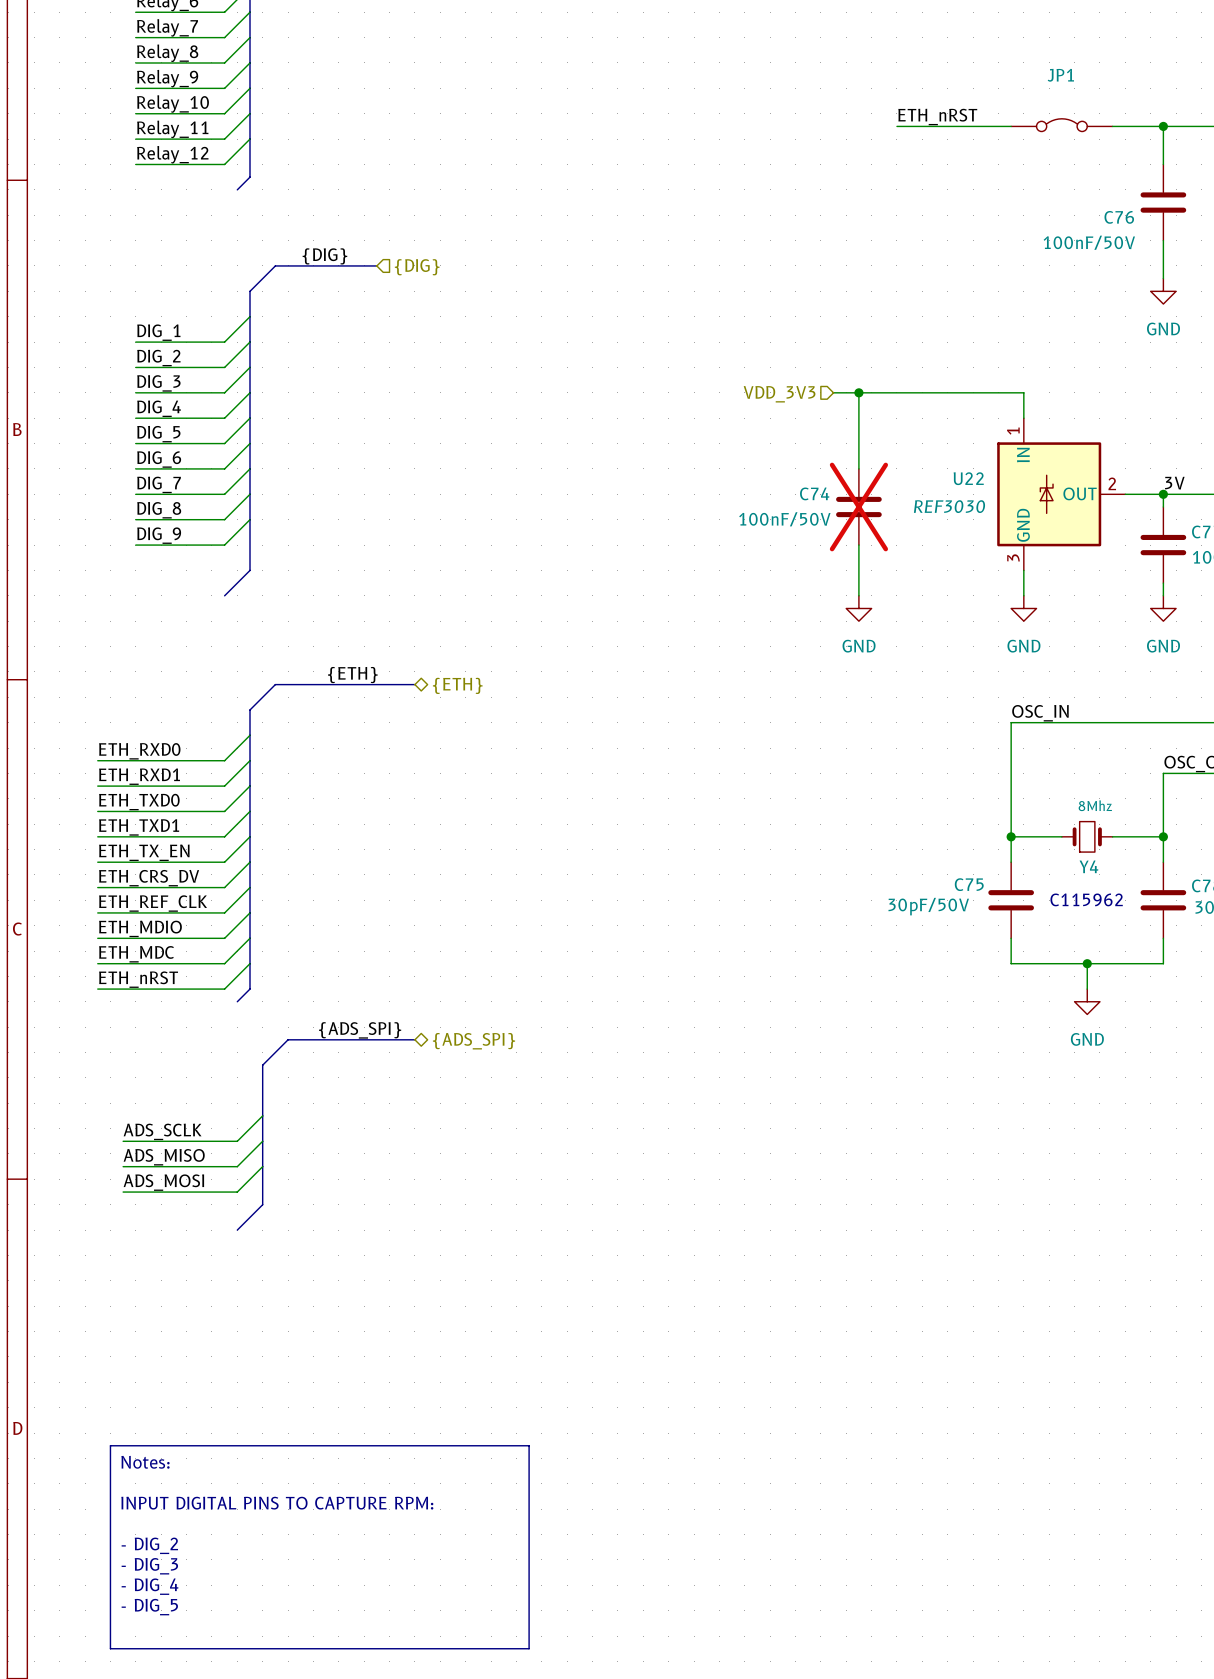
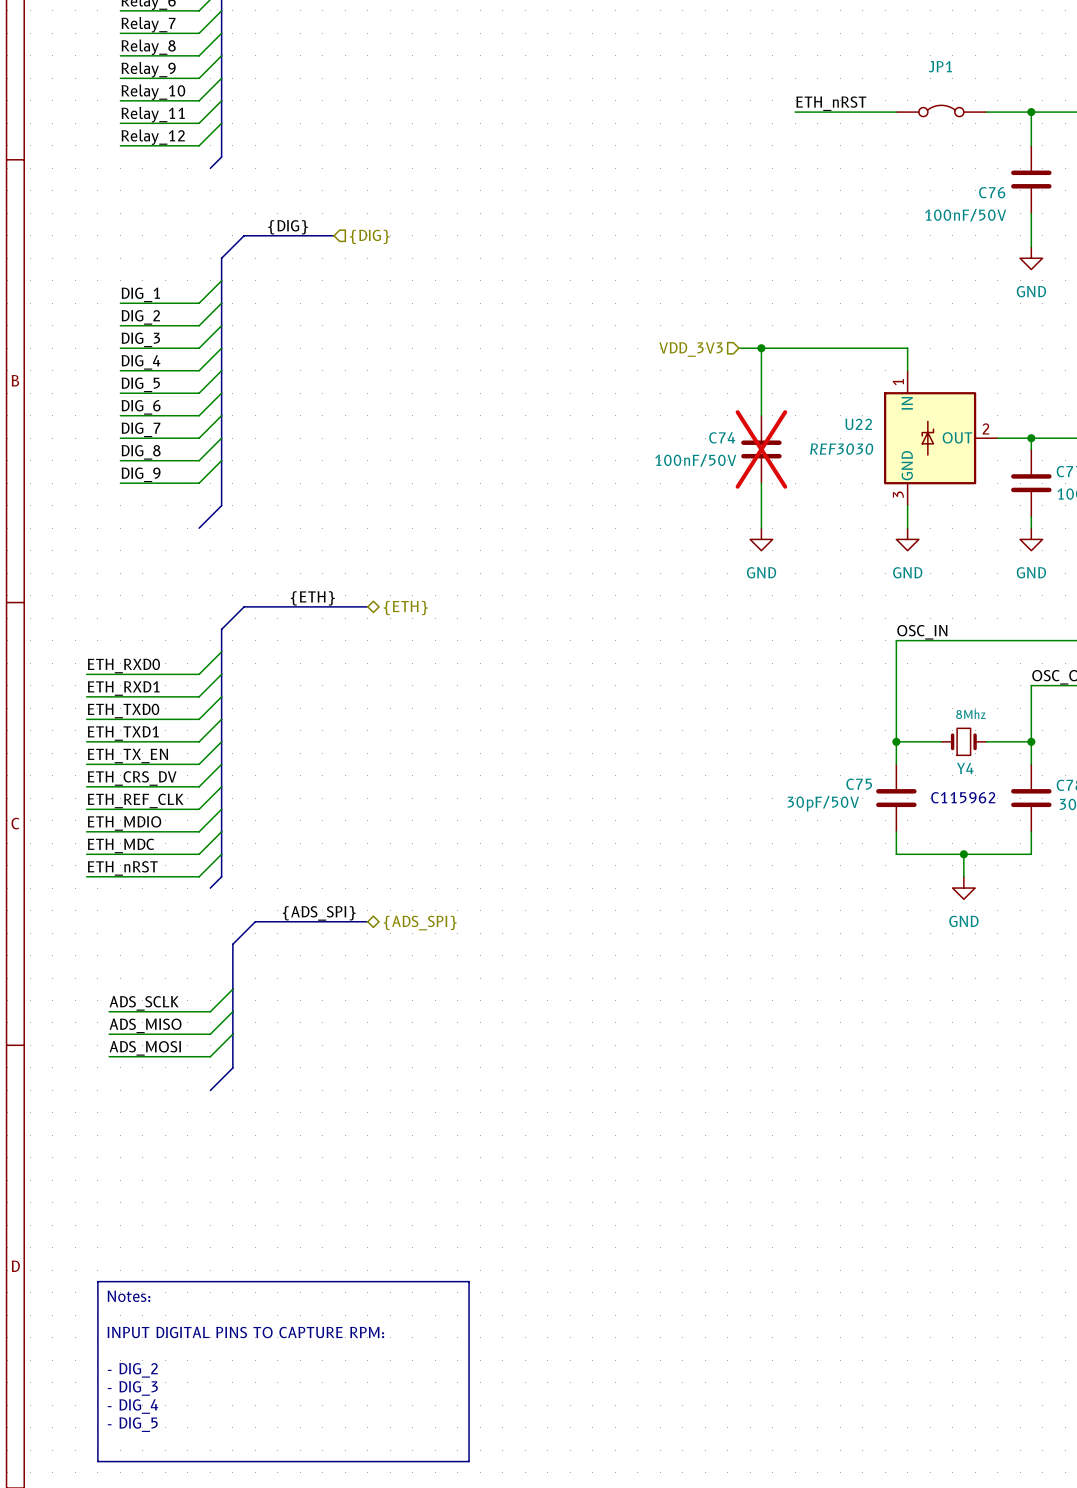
label: 3V (1174, 483) -> none

